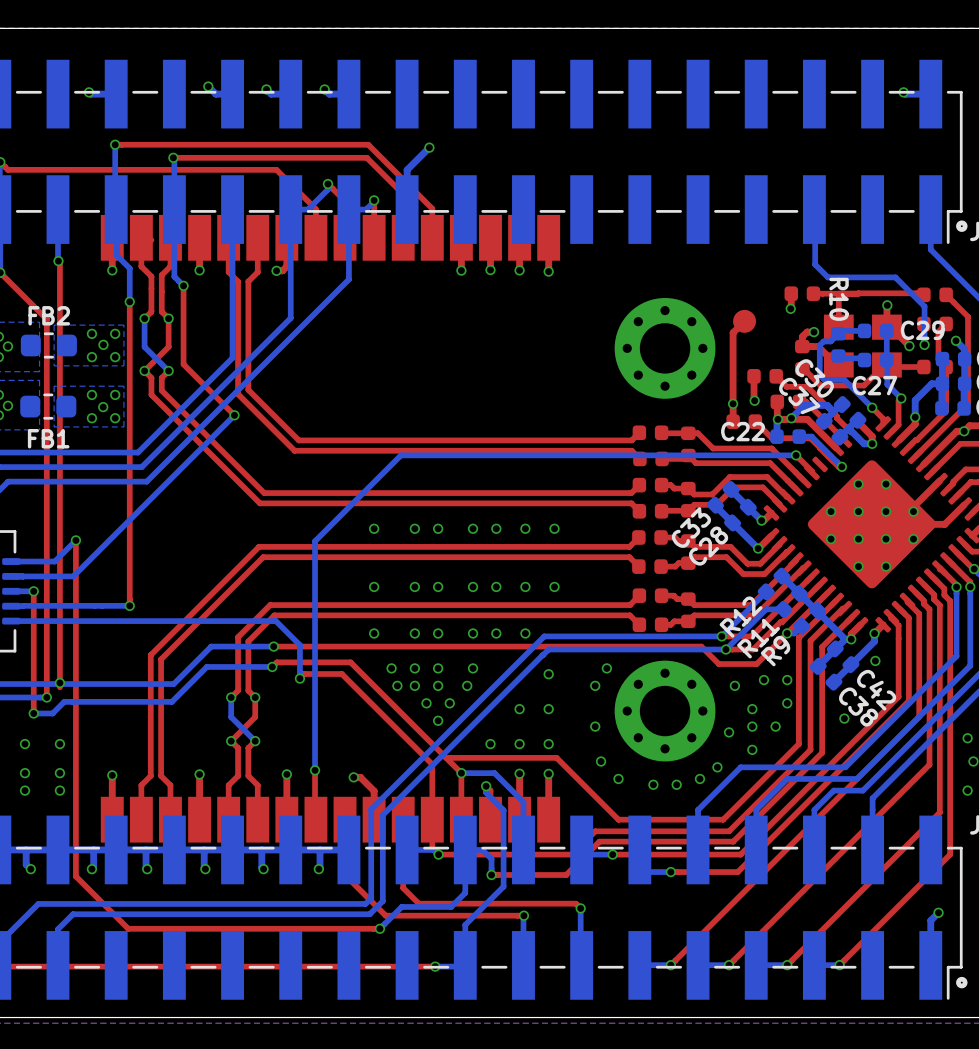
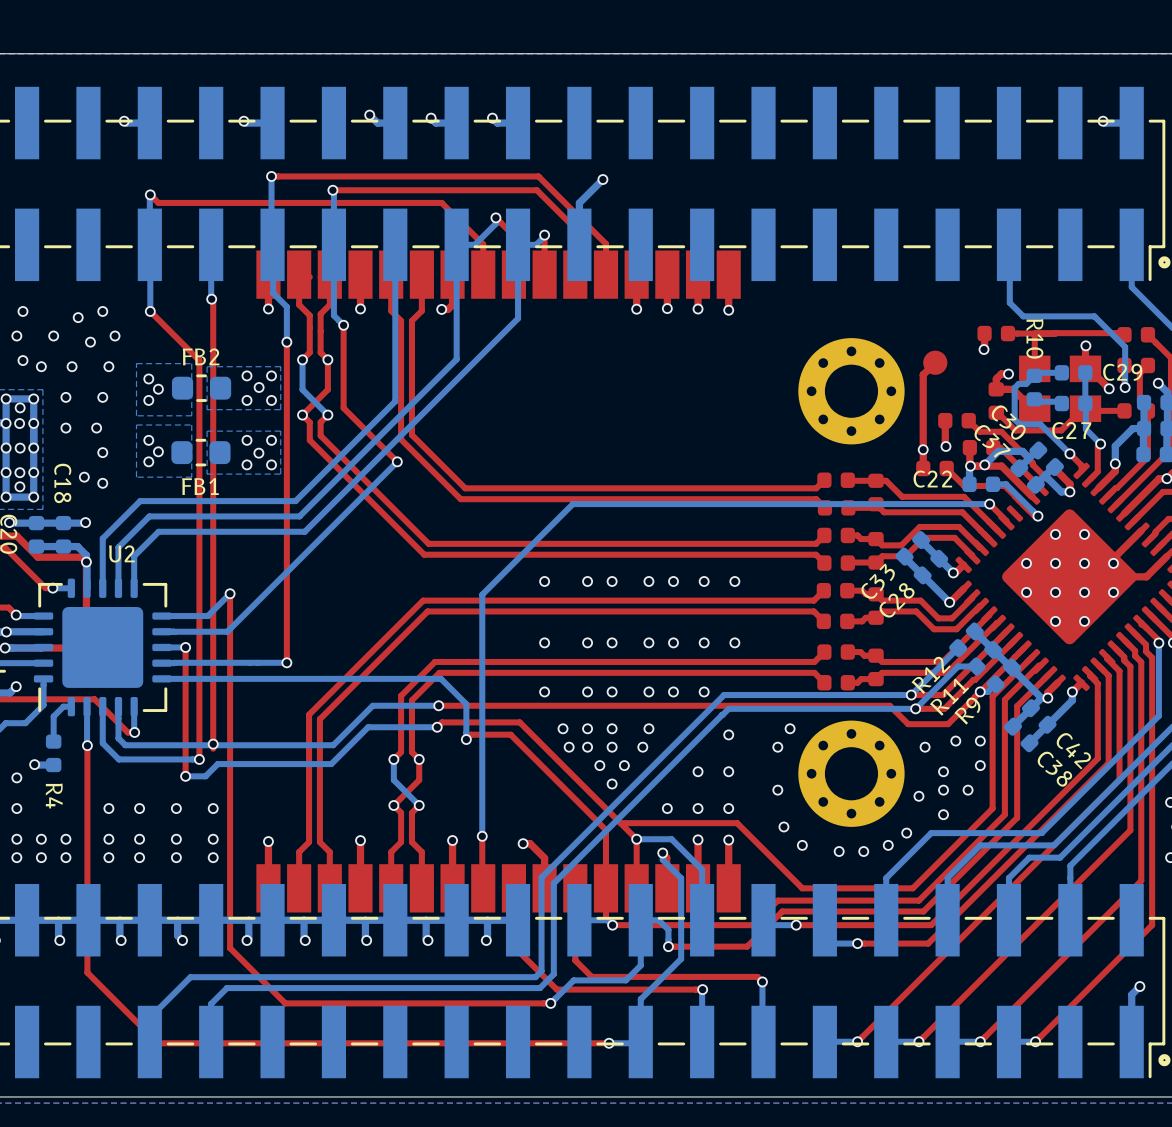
via: (875, 660) -> none
via: (844, 718) -> none

